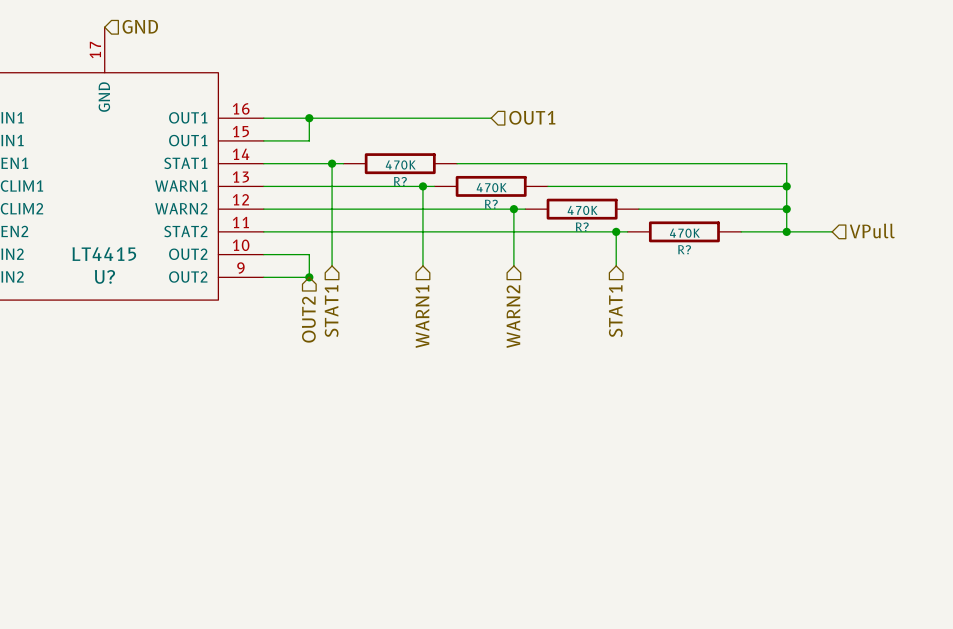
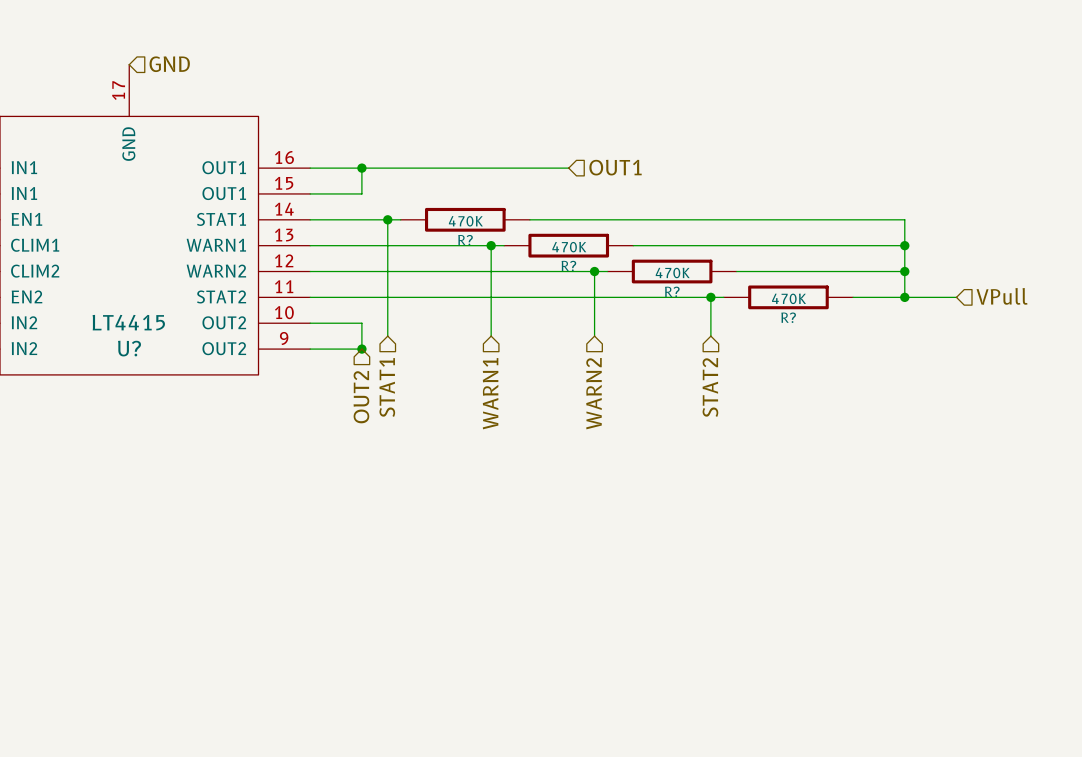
hierarchical label: STAT1 (615, 311) -> STAT2 (710, 387)

